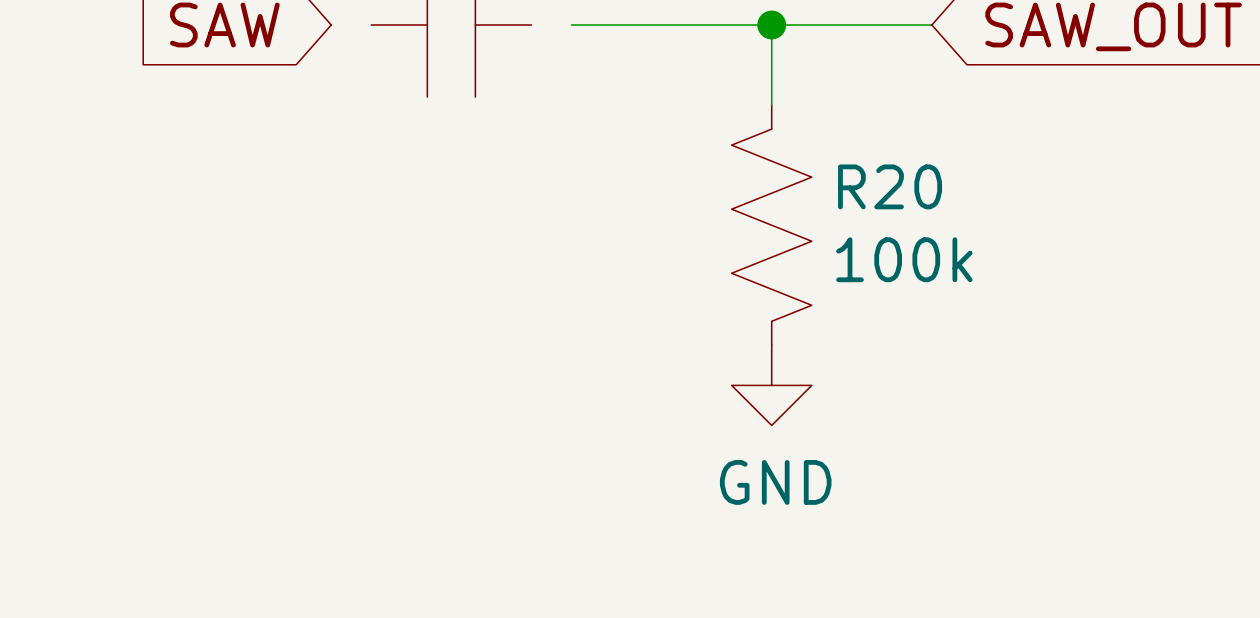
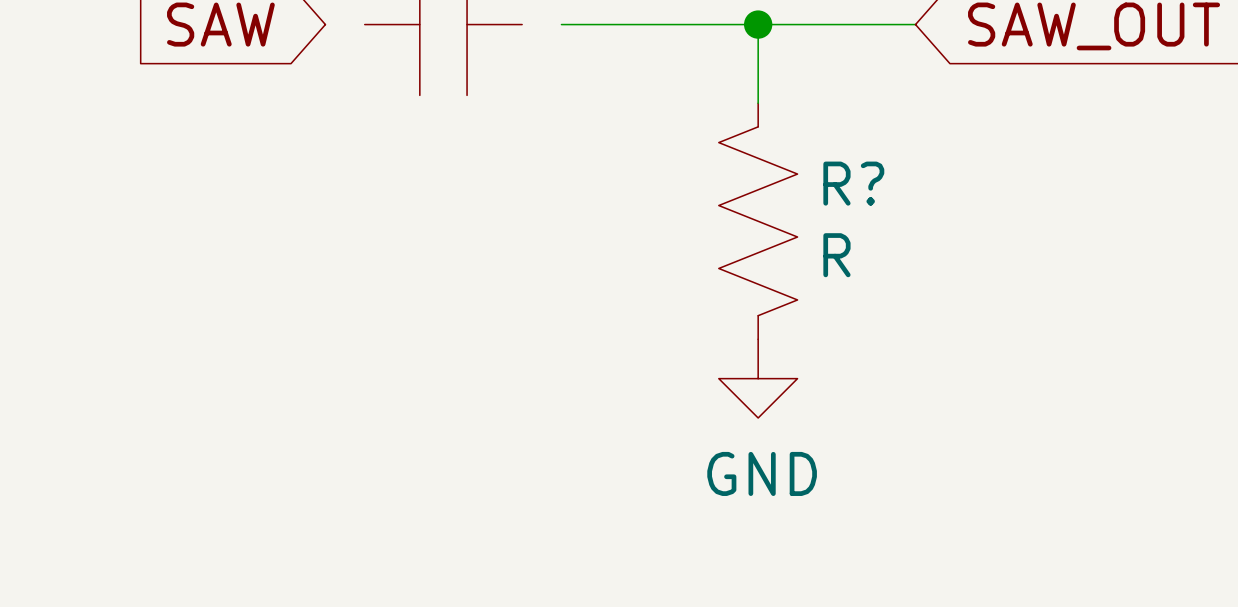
R20 name: R20 (890, 186) -> R? (853, 183)
R20 value: 100k (904, 259) -> R (836, 255)

